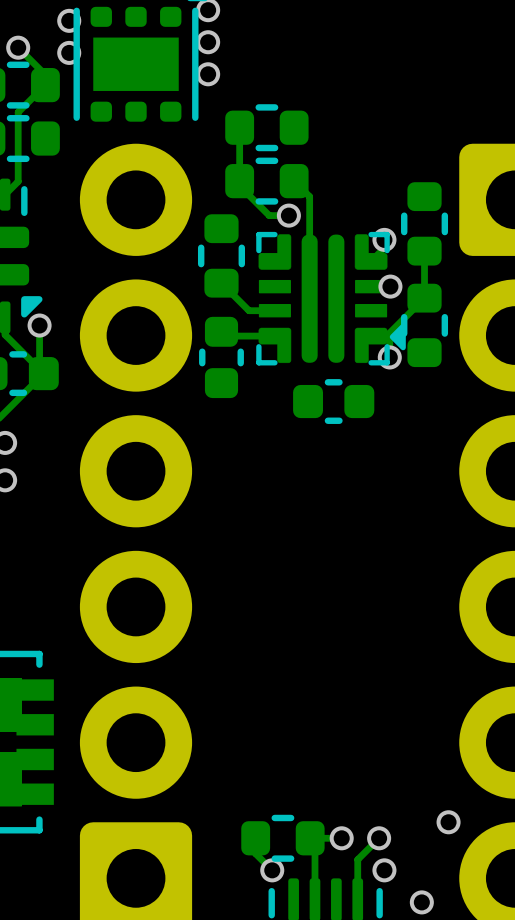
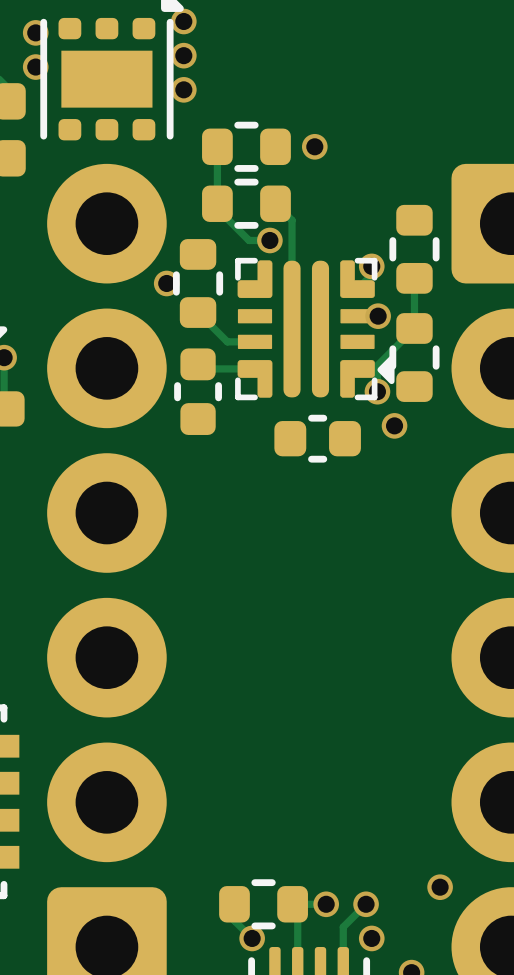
via: none -> (314, 146)
via: none -> (166, 283)
via: none -> (394, 425)

